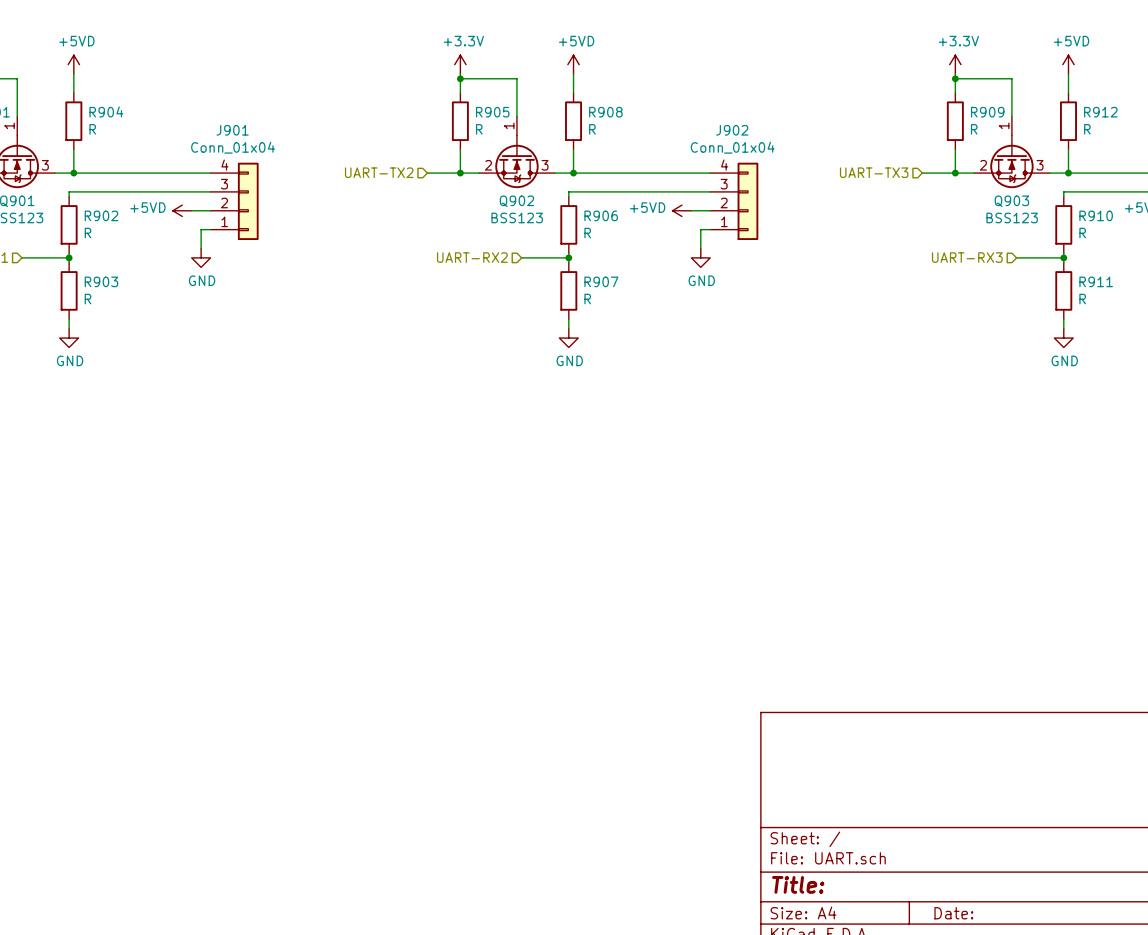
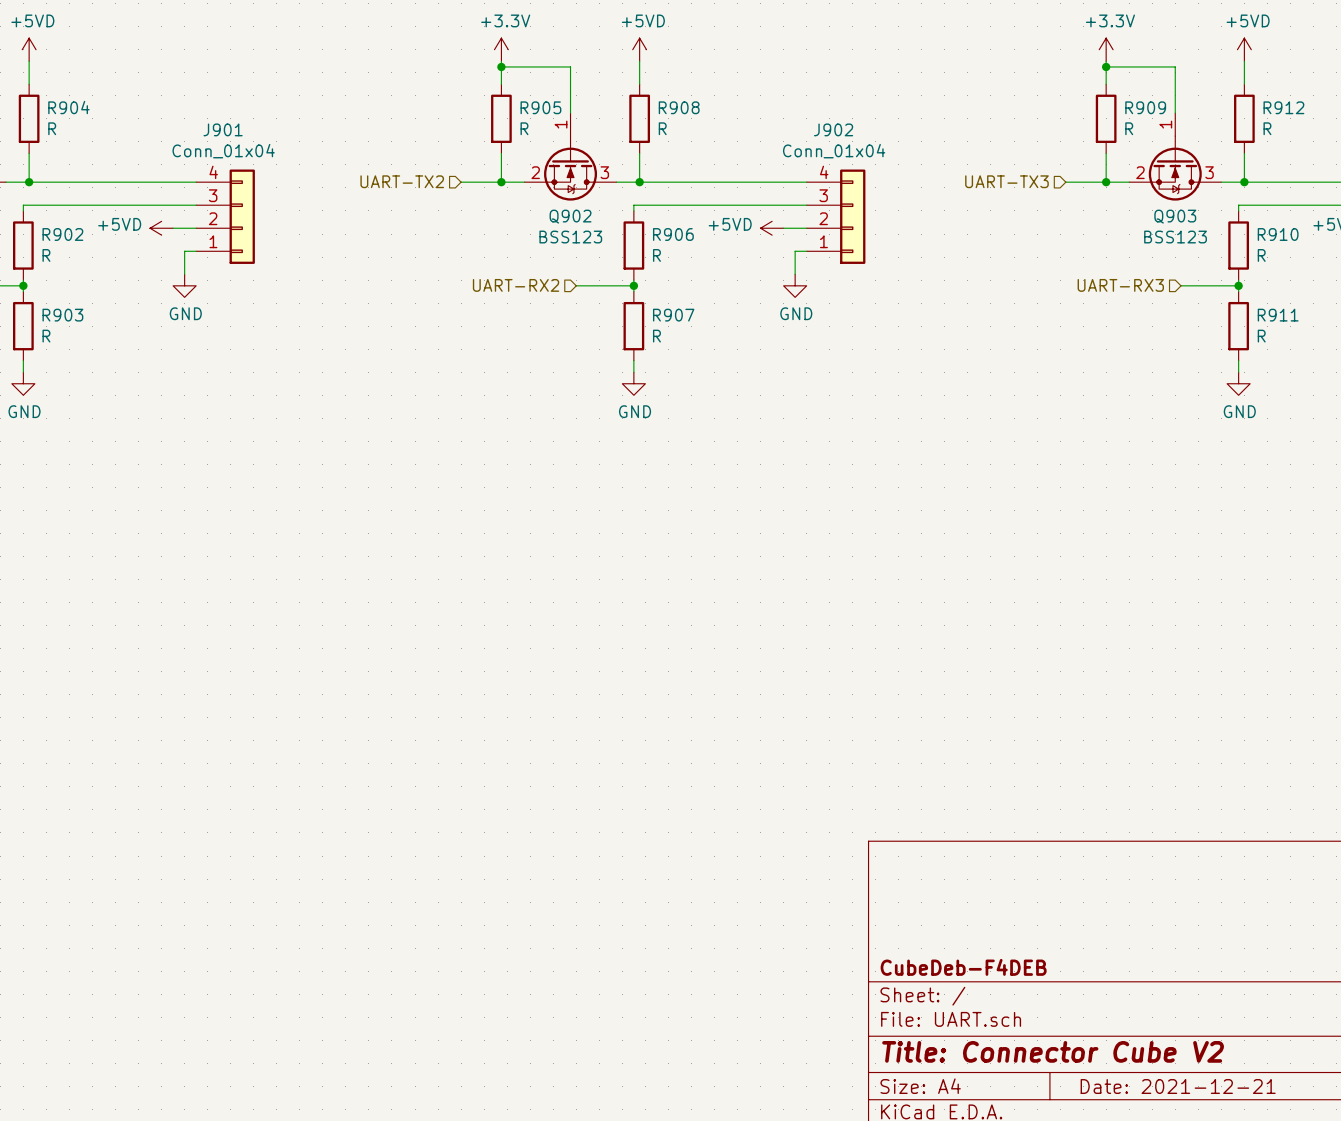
title block: none -> CubeDeb-F4DEB (963, 967)
title block: Title: (798, 884) -> Title: Connector Cube V2 (1053, 1051)
title block: Date: (953, 913) -> Date: 2021-12-21 (1178, 1086)

